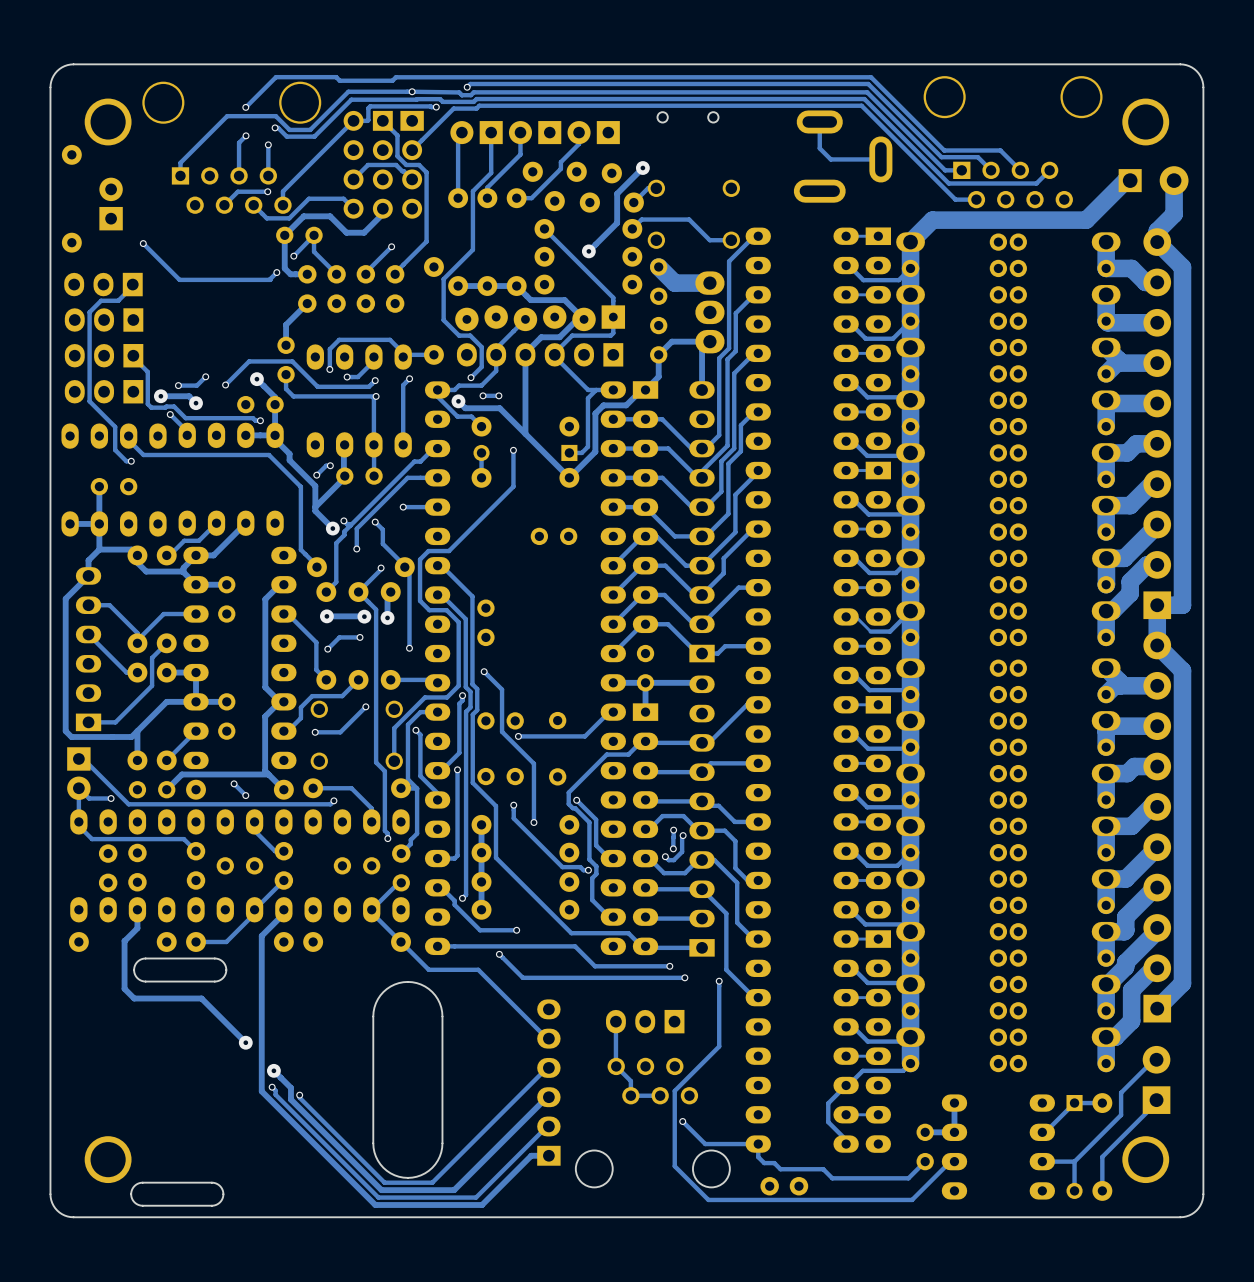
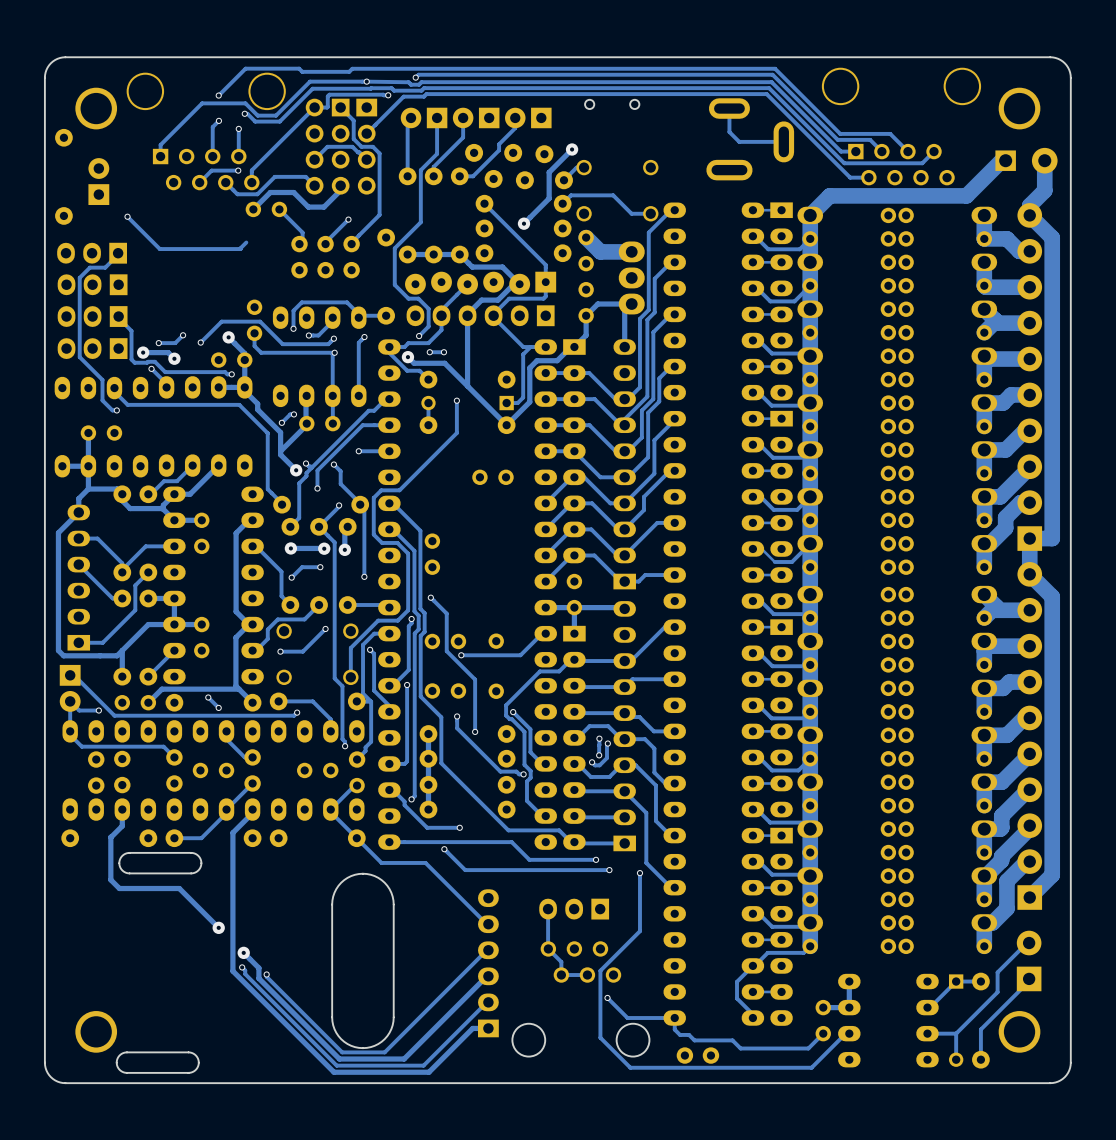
track: (284, 235) (284, 268) (290, 274) (307, 274) -> none
track: (314, 235) (293, 256) -> (279, 209) (302, 232) (302, 243)
track: (314, 236) (314, 251) (336, 274) -> none
via: (293, 256) -> none
via: (276, 272) -> none
part: (307, 288) -> none
track: (307, 303) (286, 324) (286, 345) -> none

